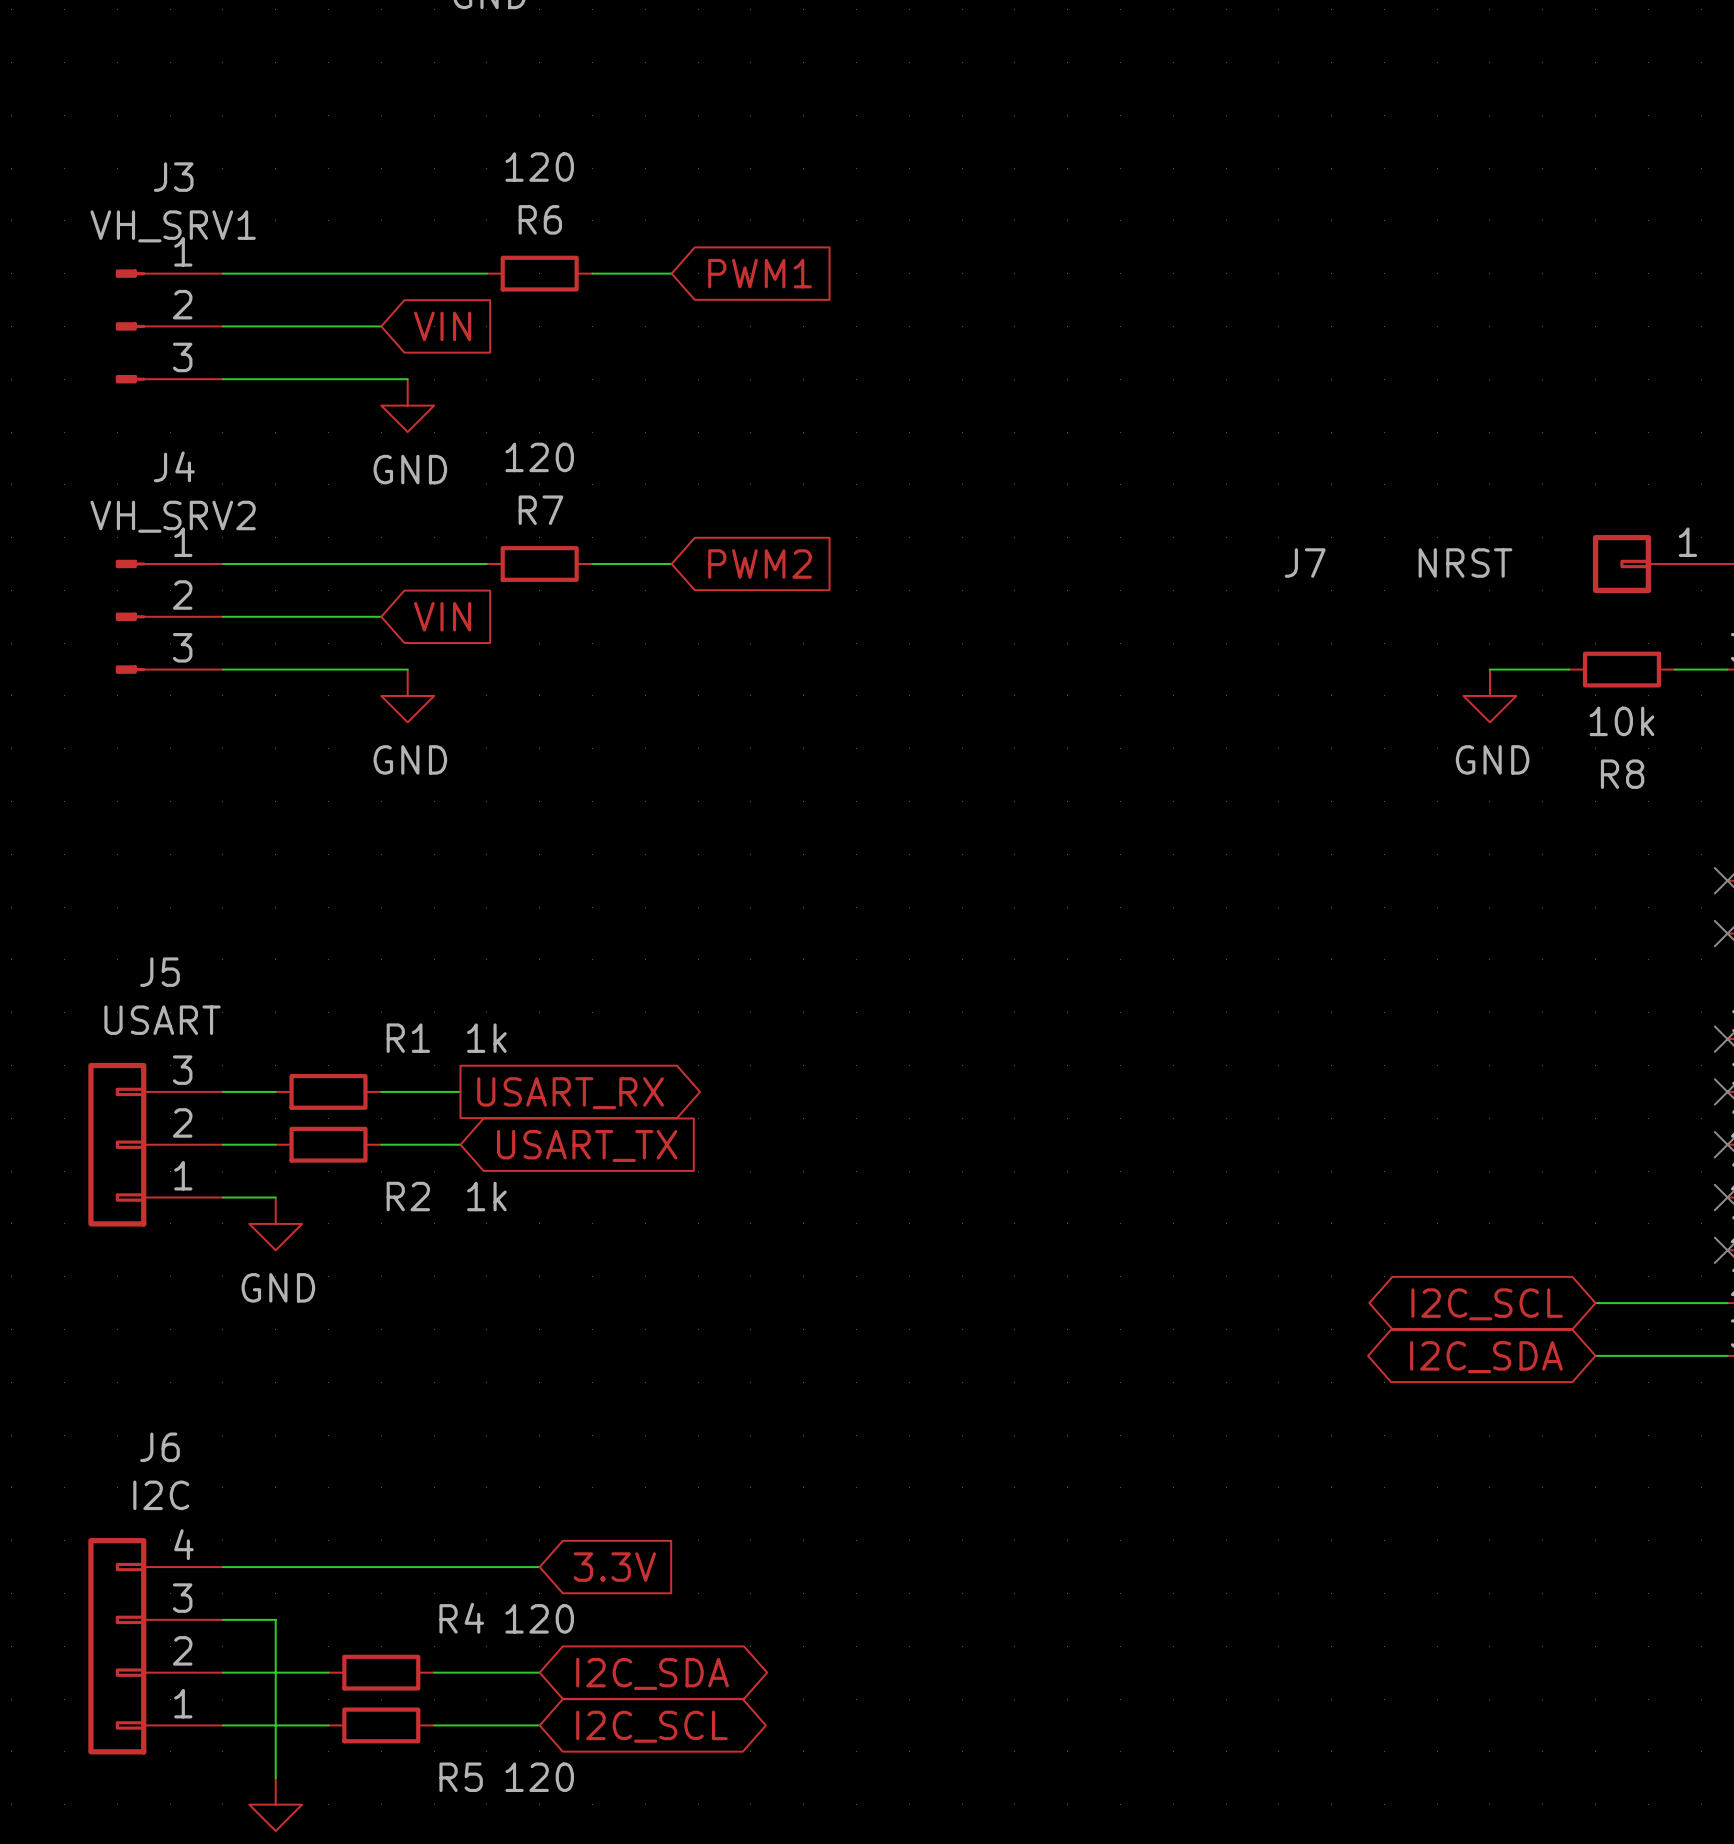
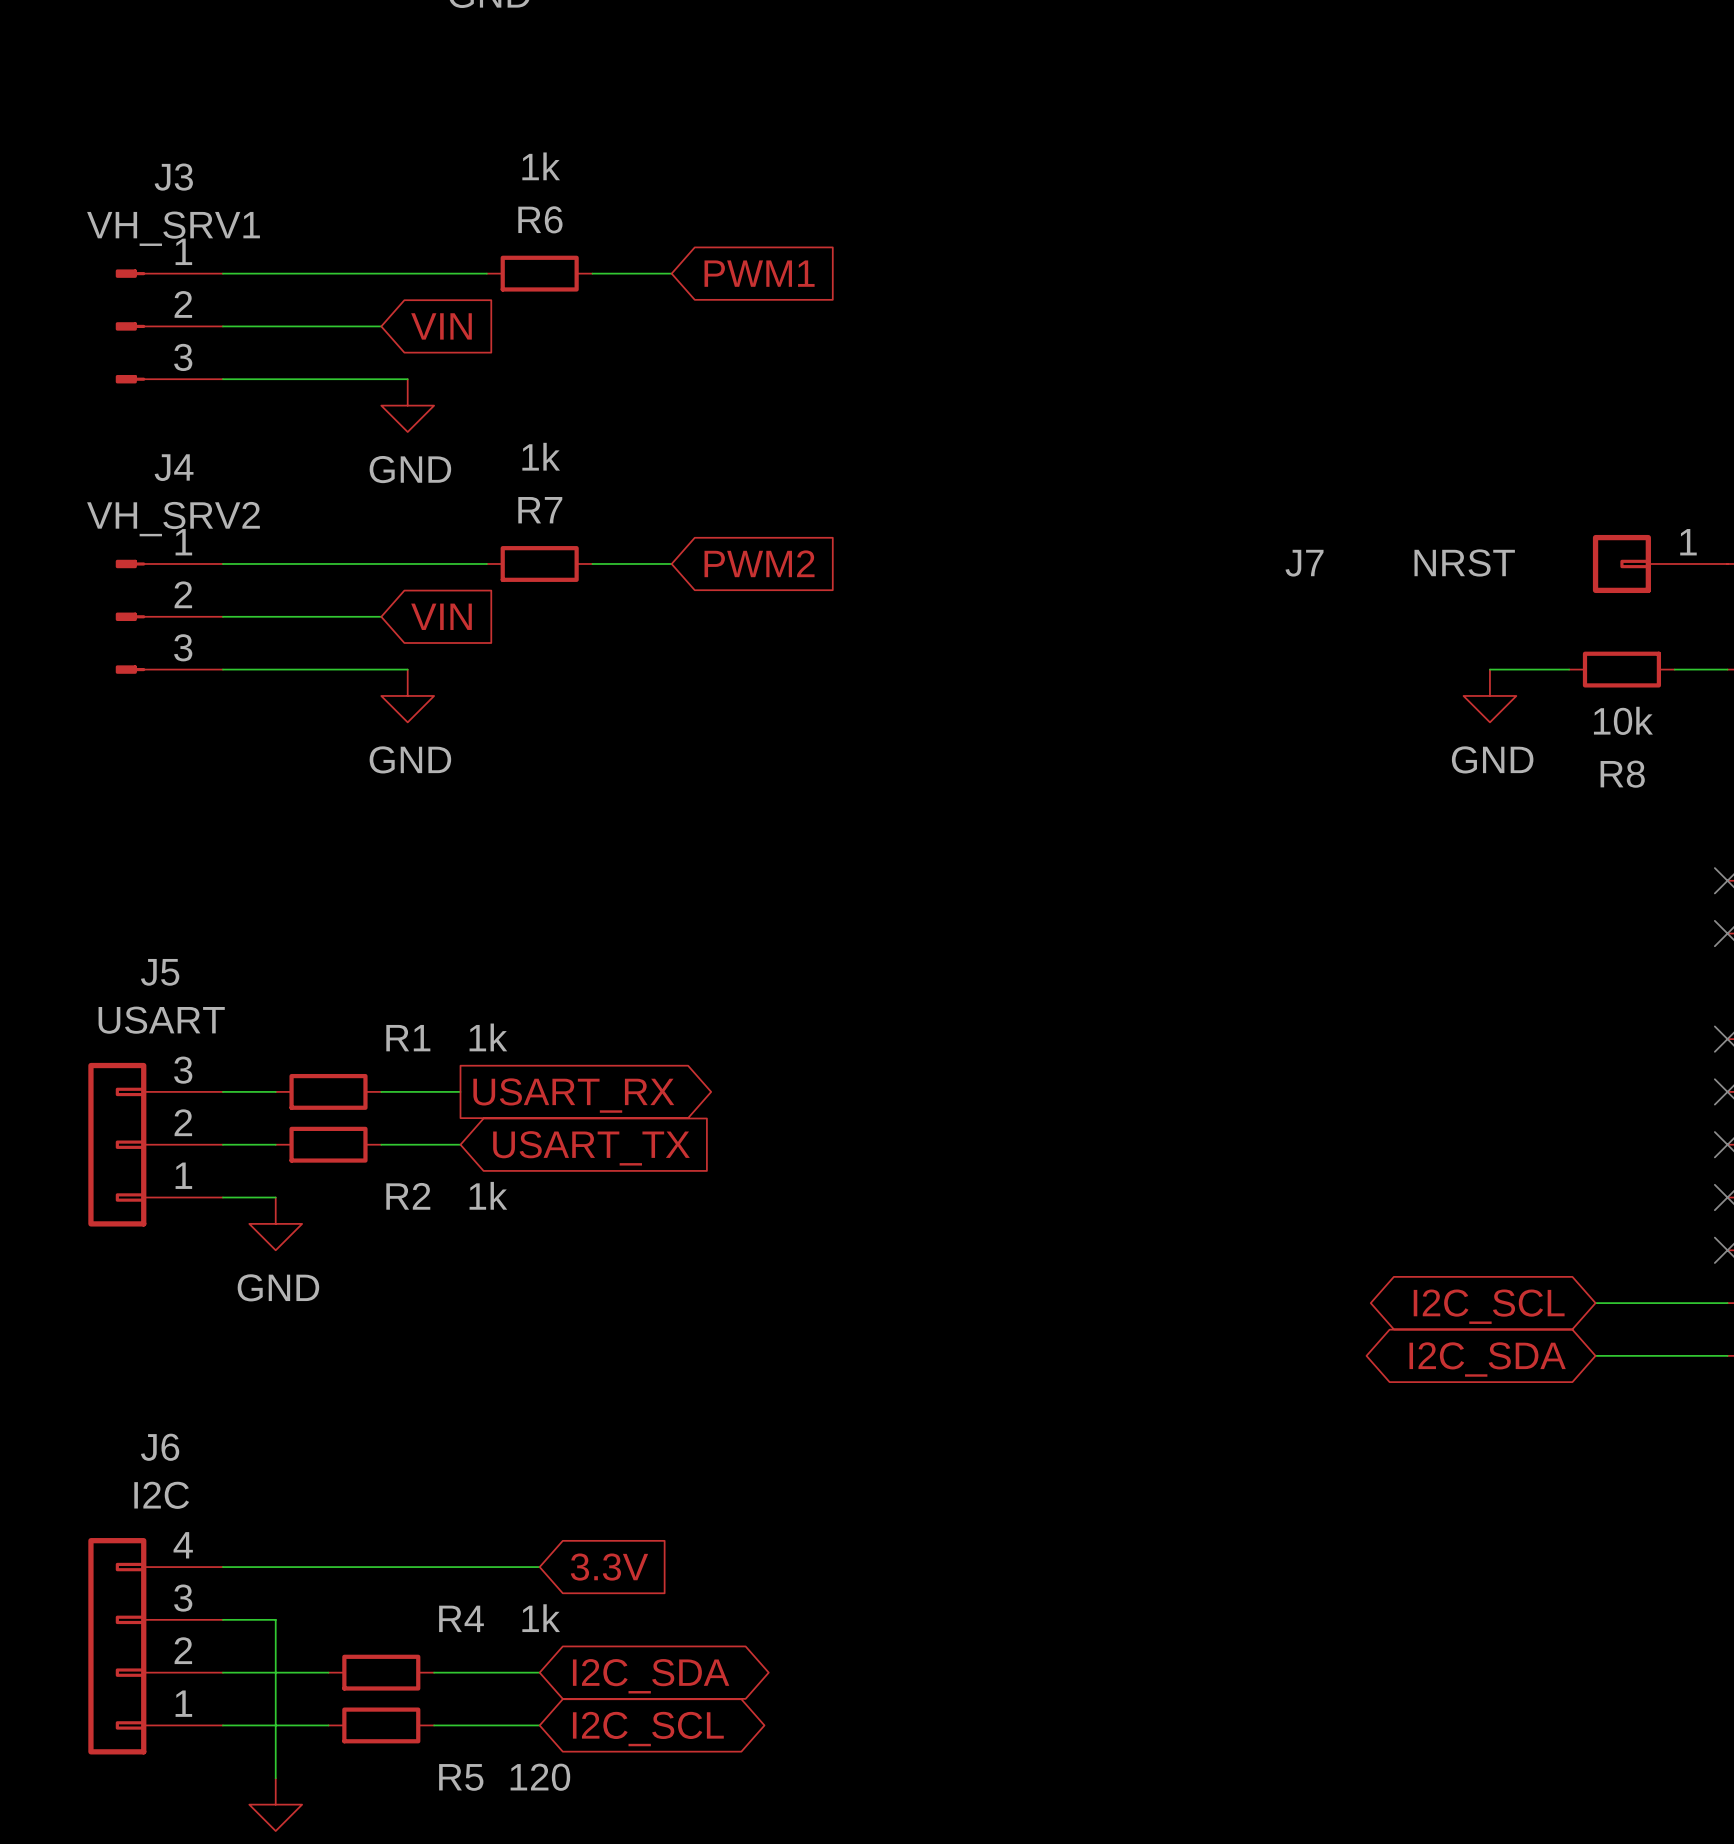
R6 value: 120 (539, 167) -> 1k (541, 166)
R7 value: 120 (539, 457) -> 1k (541, 456)
R4 value: 120 (539, 1618) -> 1k (541, 1618)

